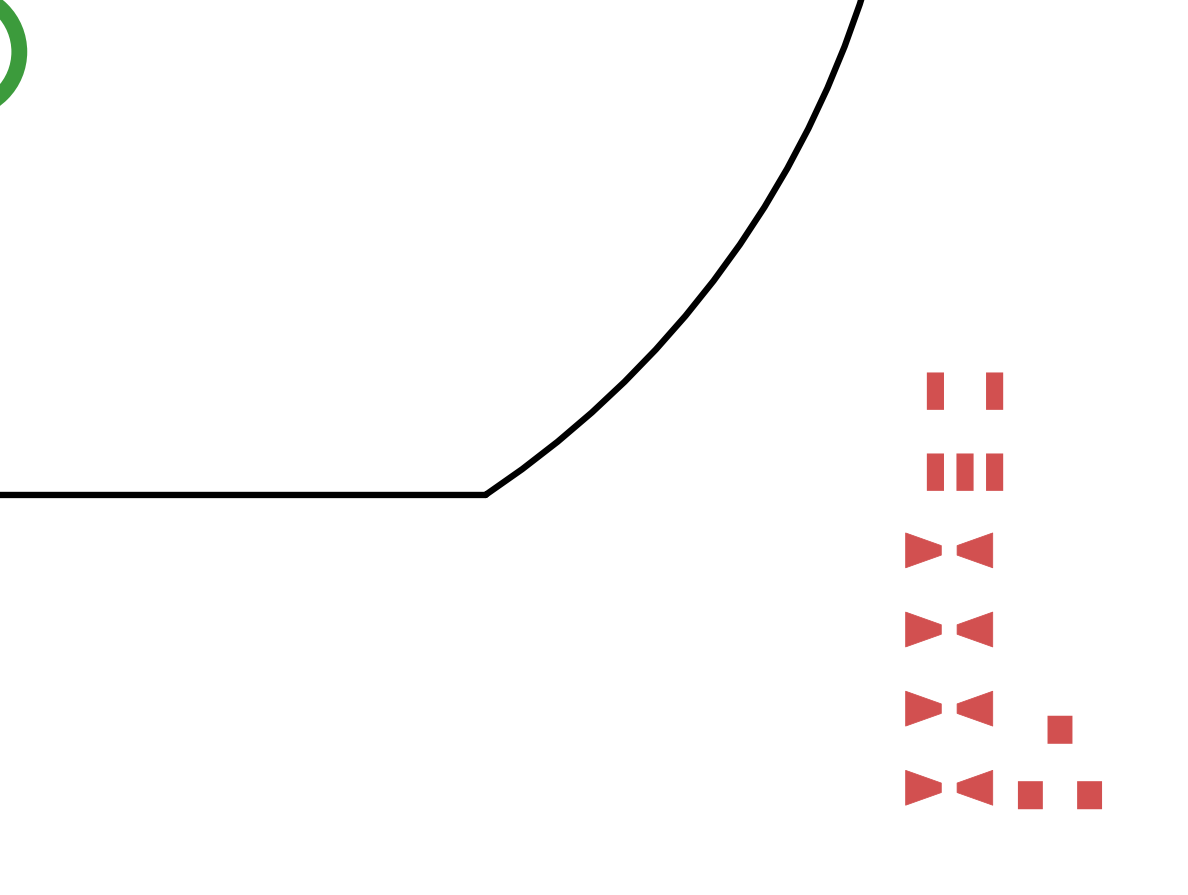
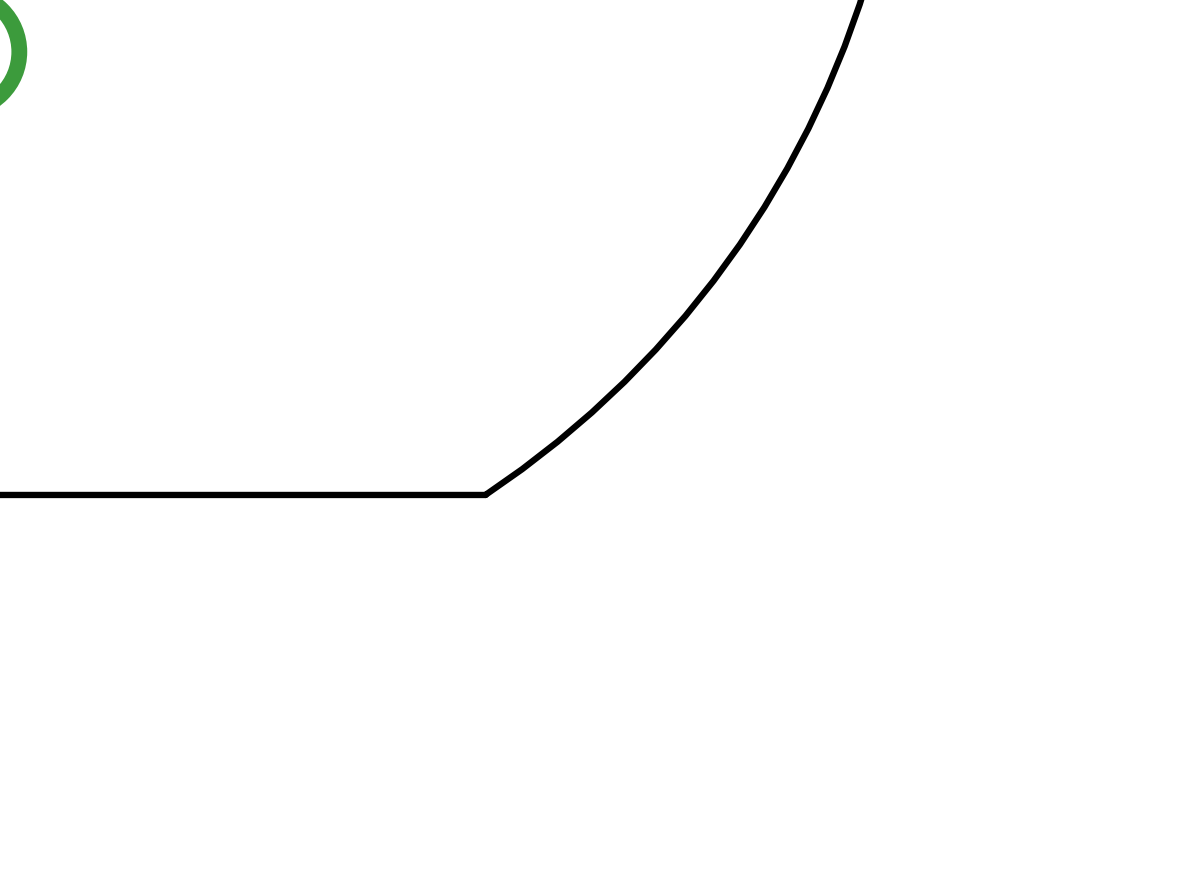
part: (965, 431) -> none
part: (949, 550) -> none
part: (949, 629) -> none
part: (949, 708) -> none
part: (1059, 762) -> none
part: (949, 787) -> none

